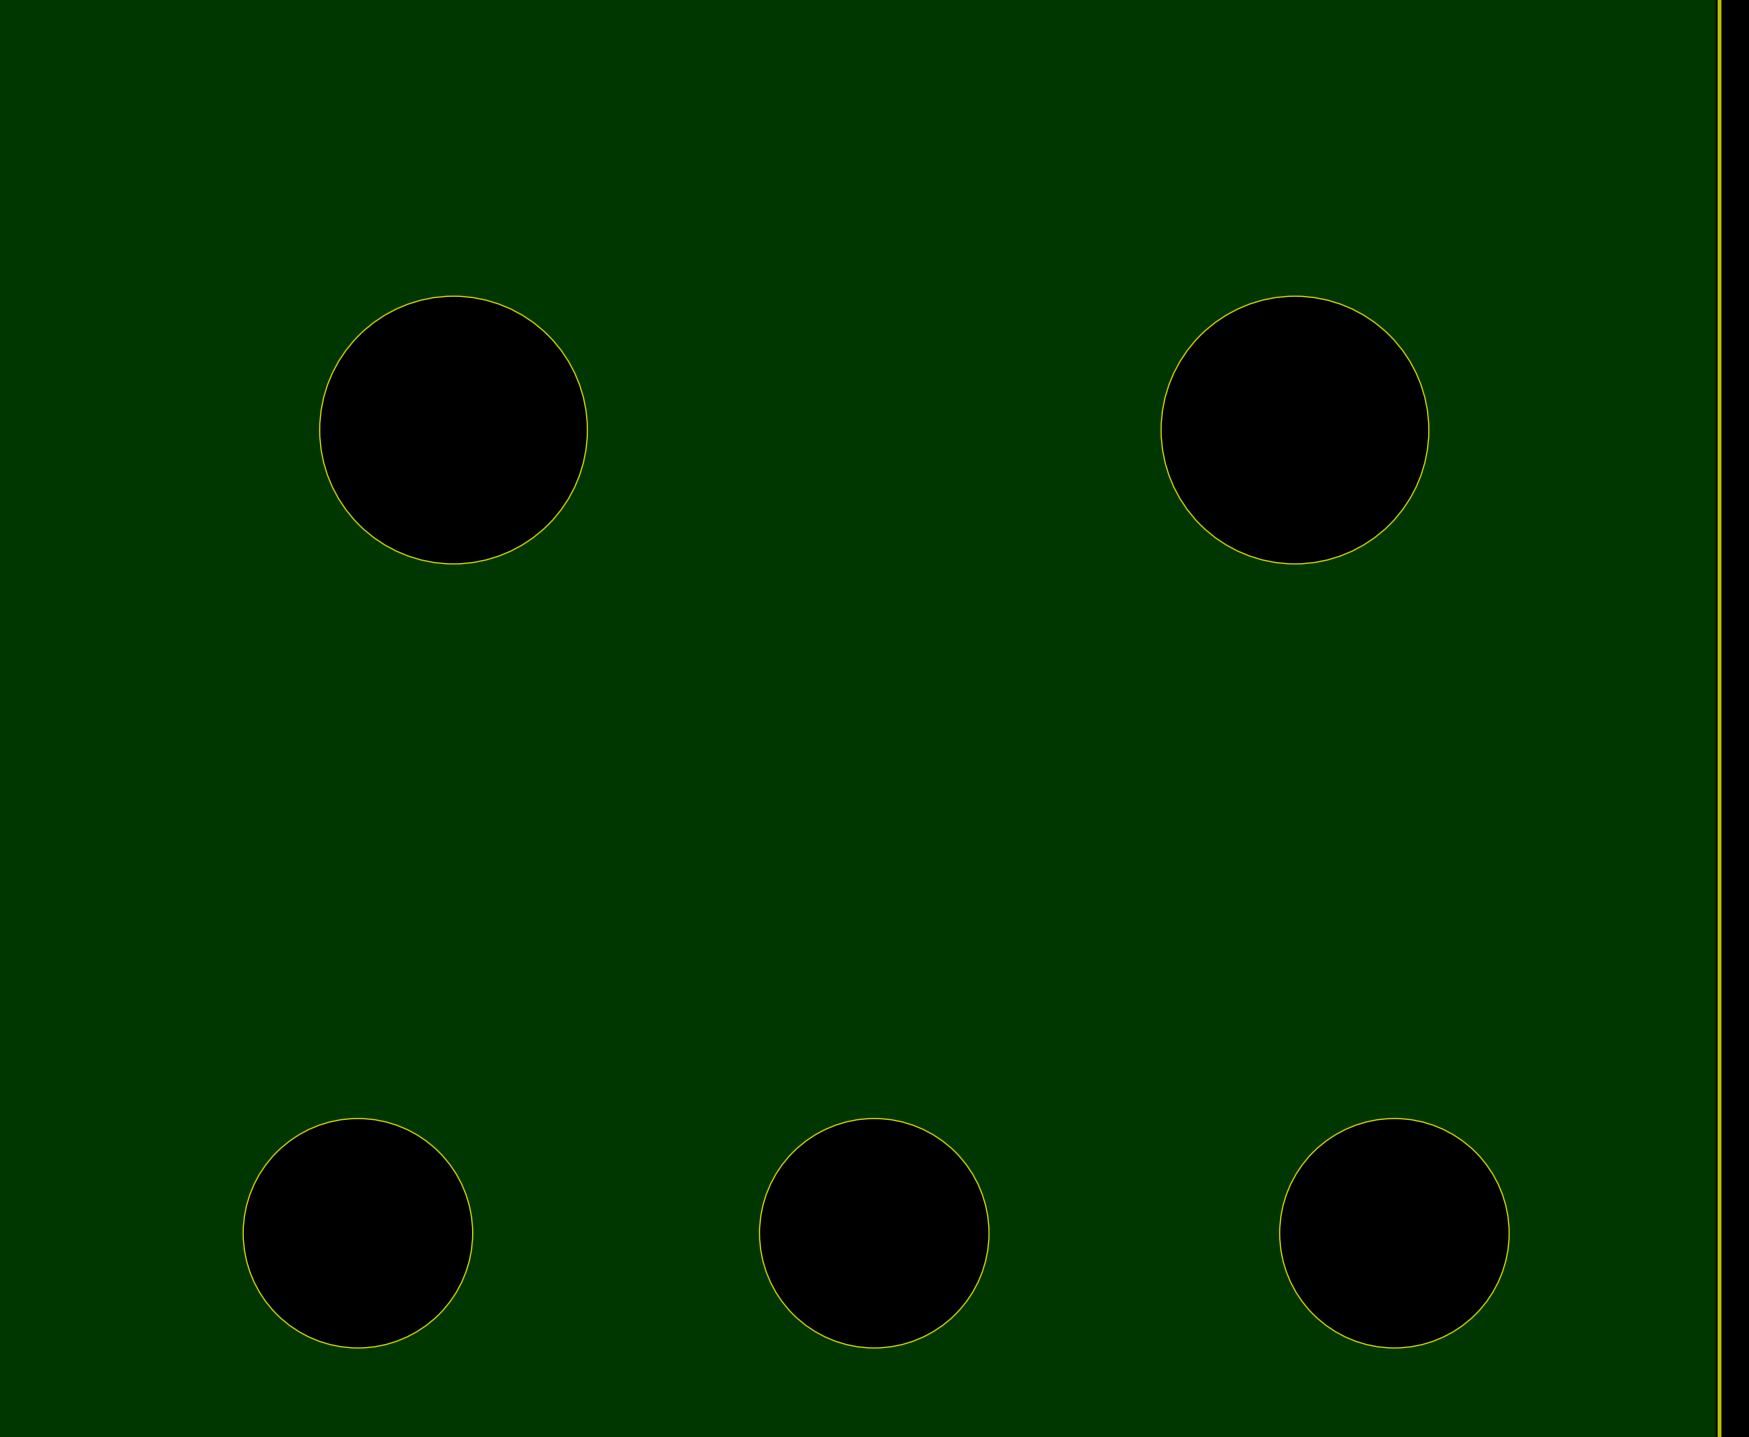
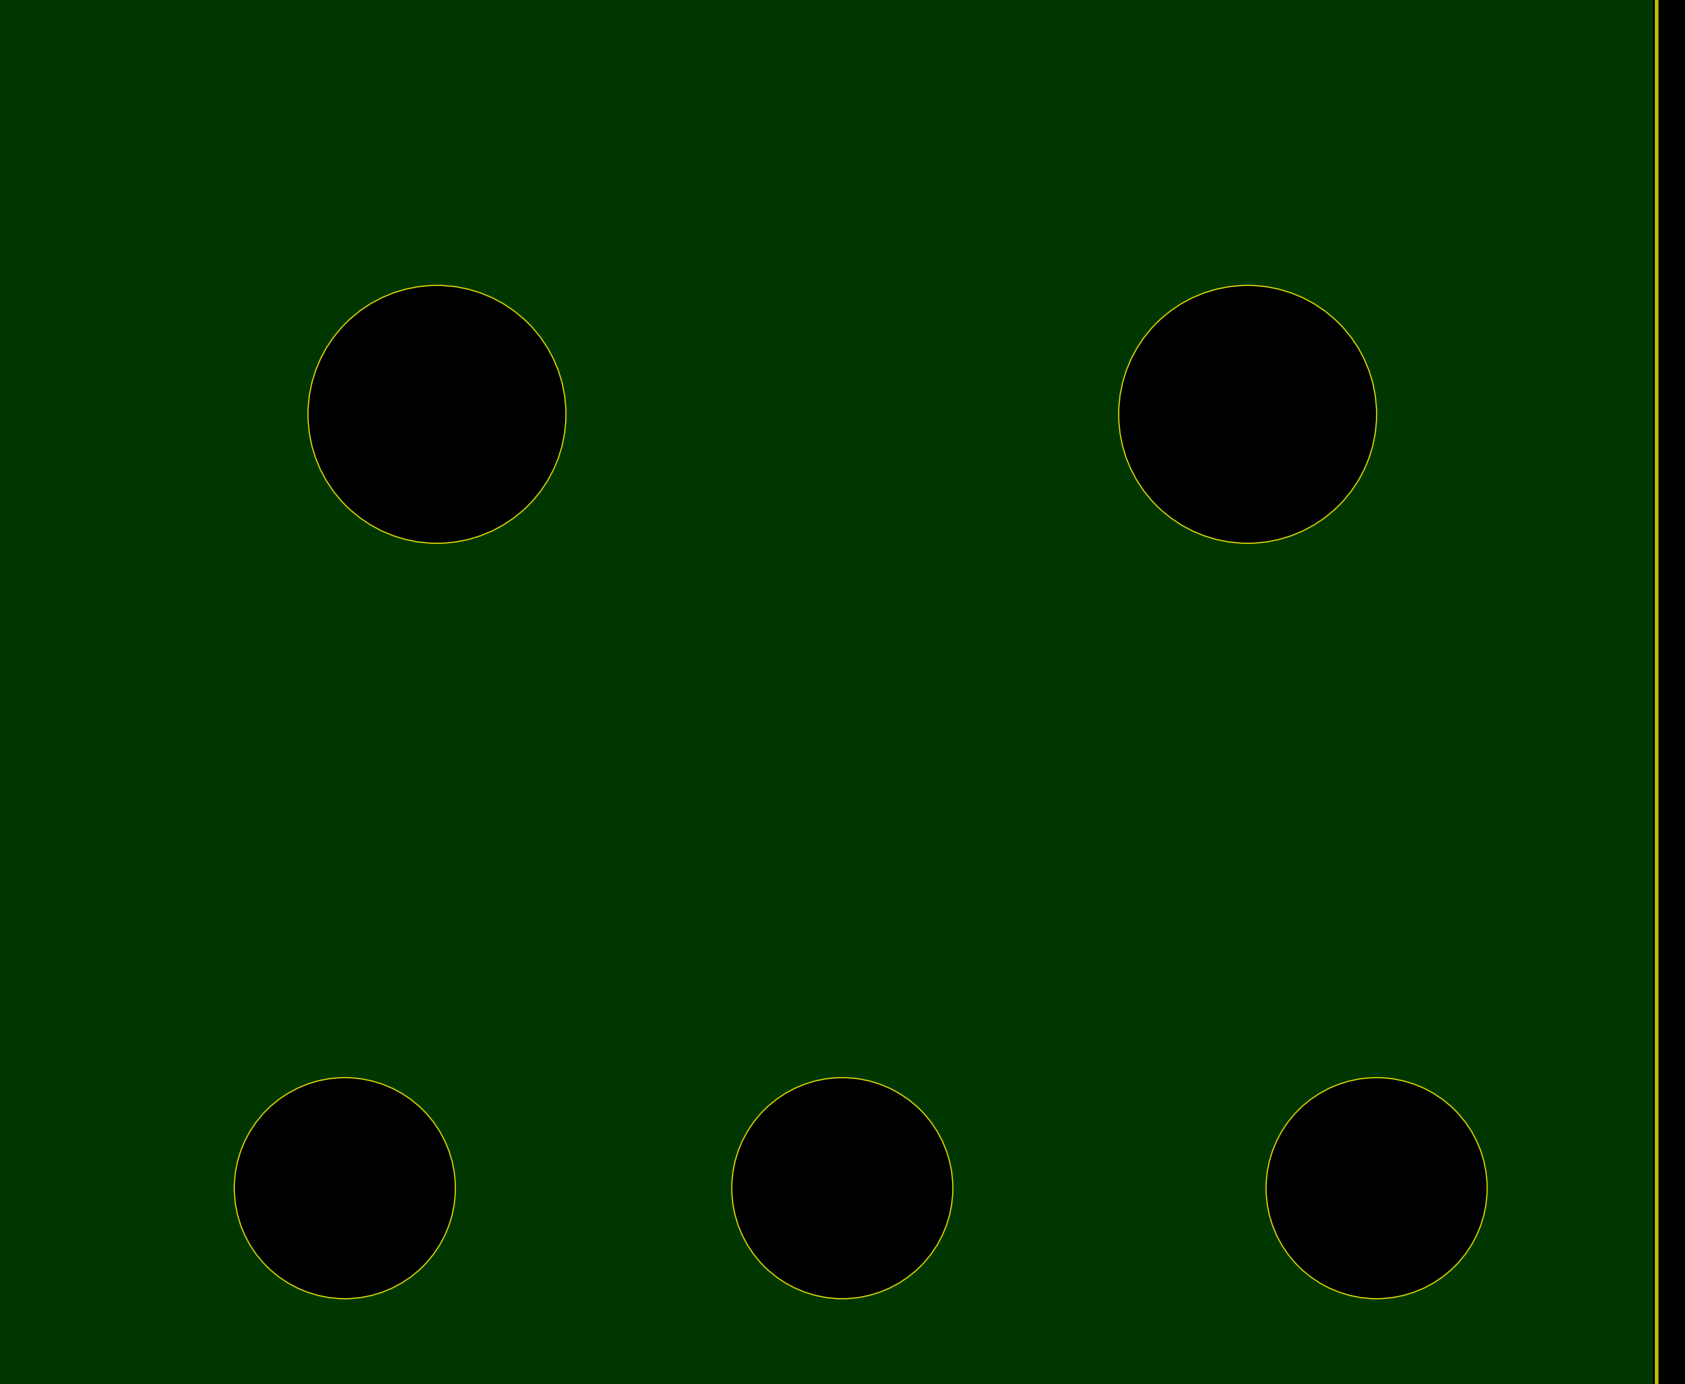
part position: (1394, 1233) -> (1376, 1188)

